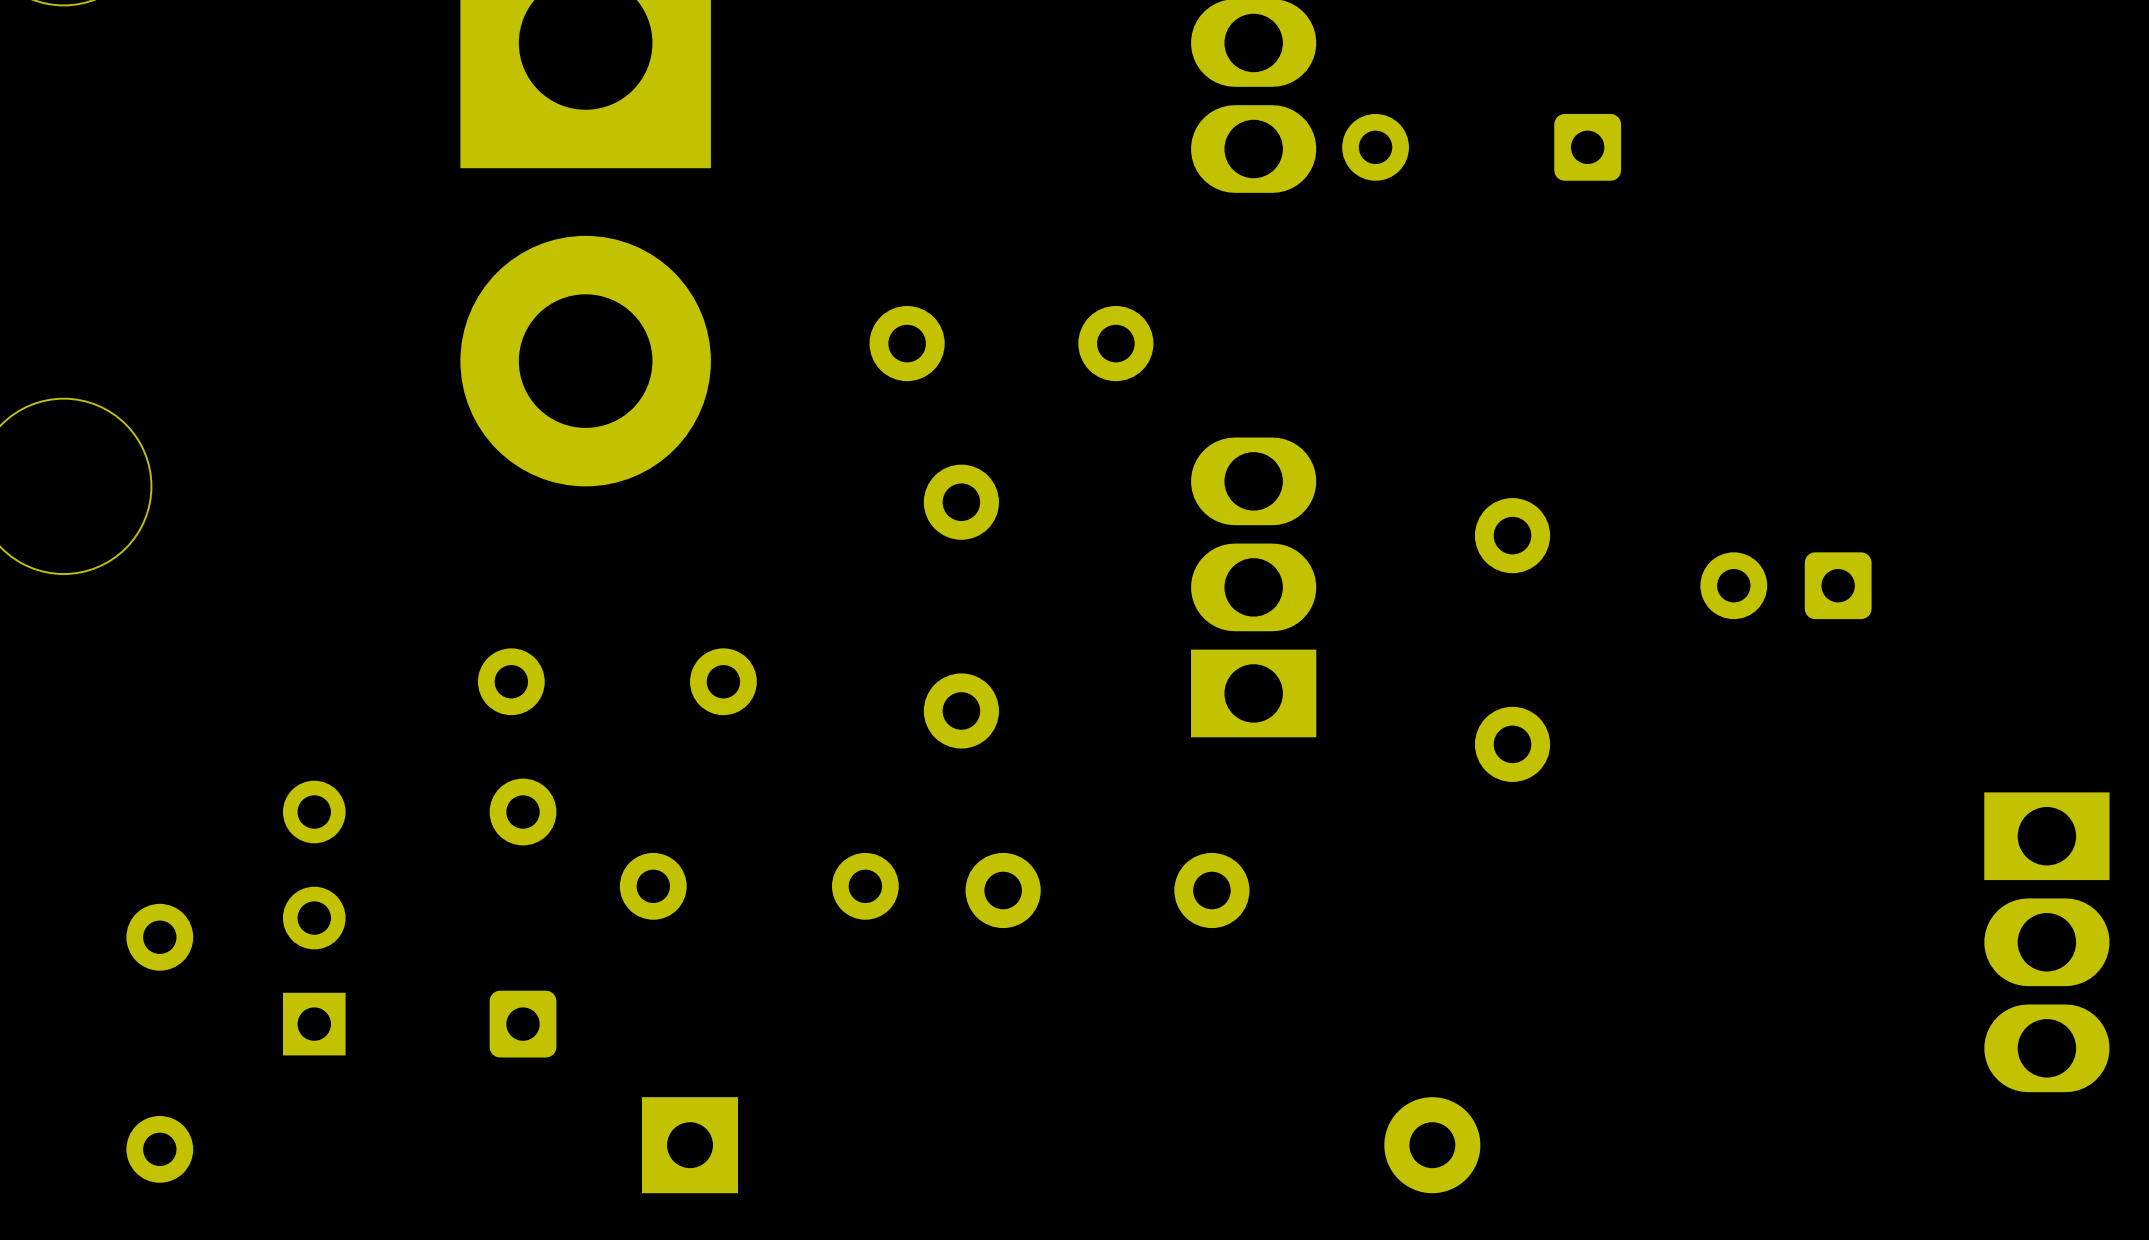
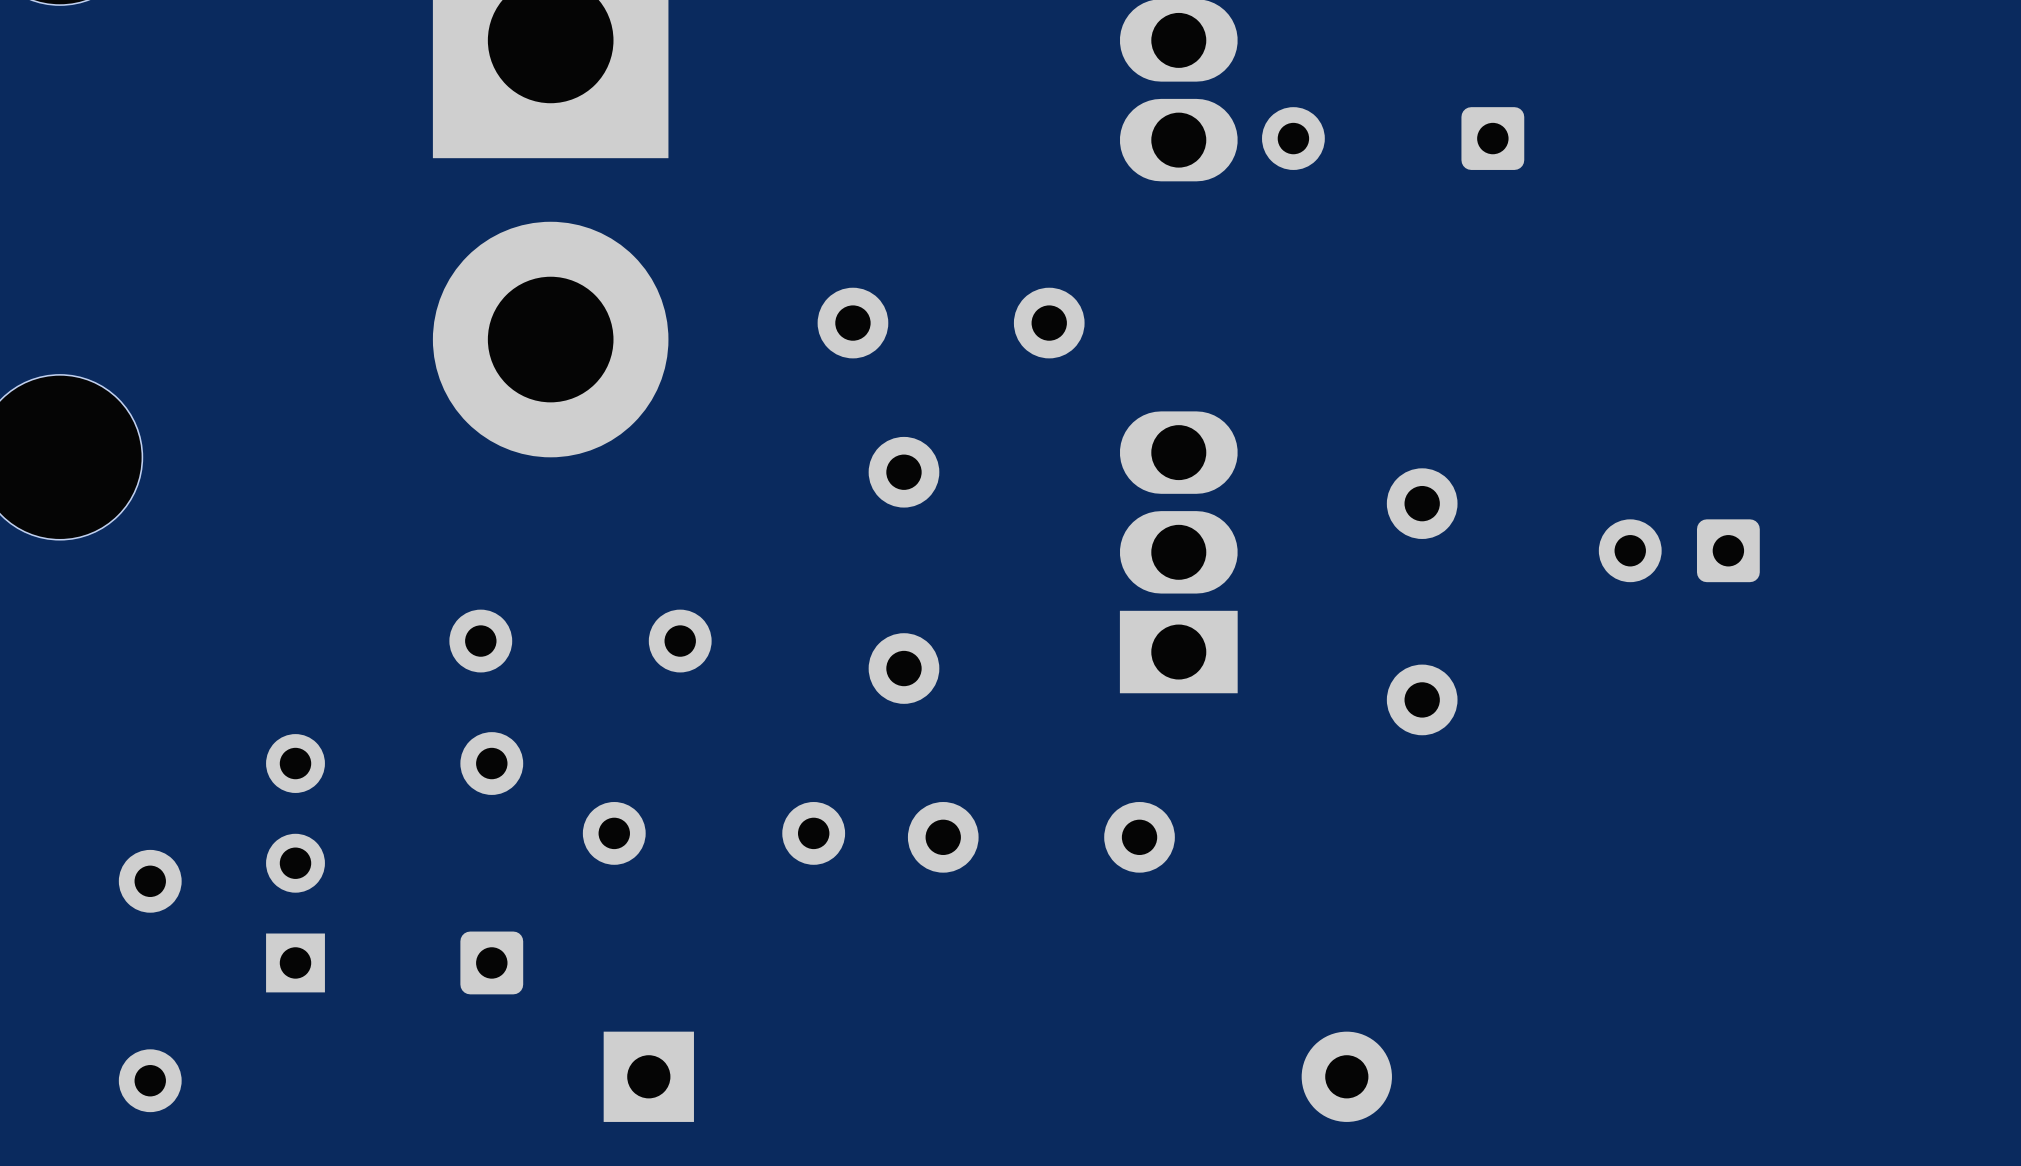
part: (2046, 942) -> none

